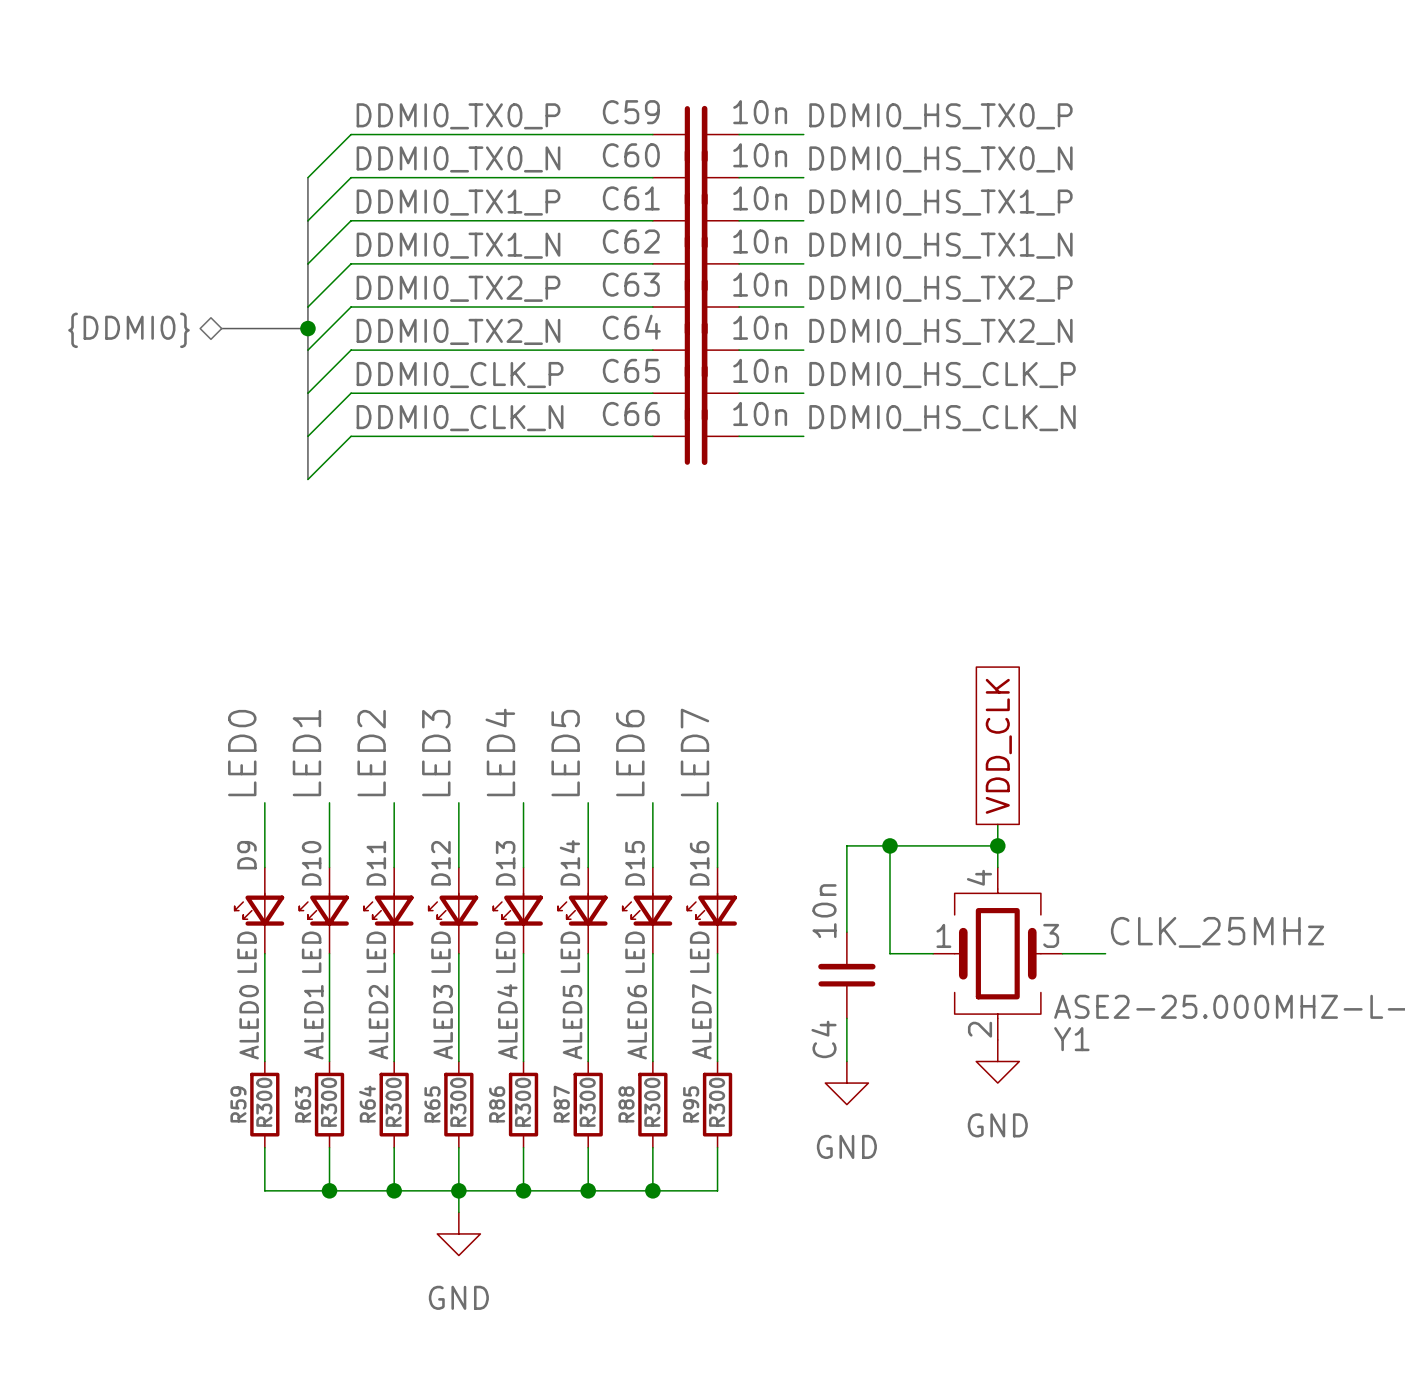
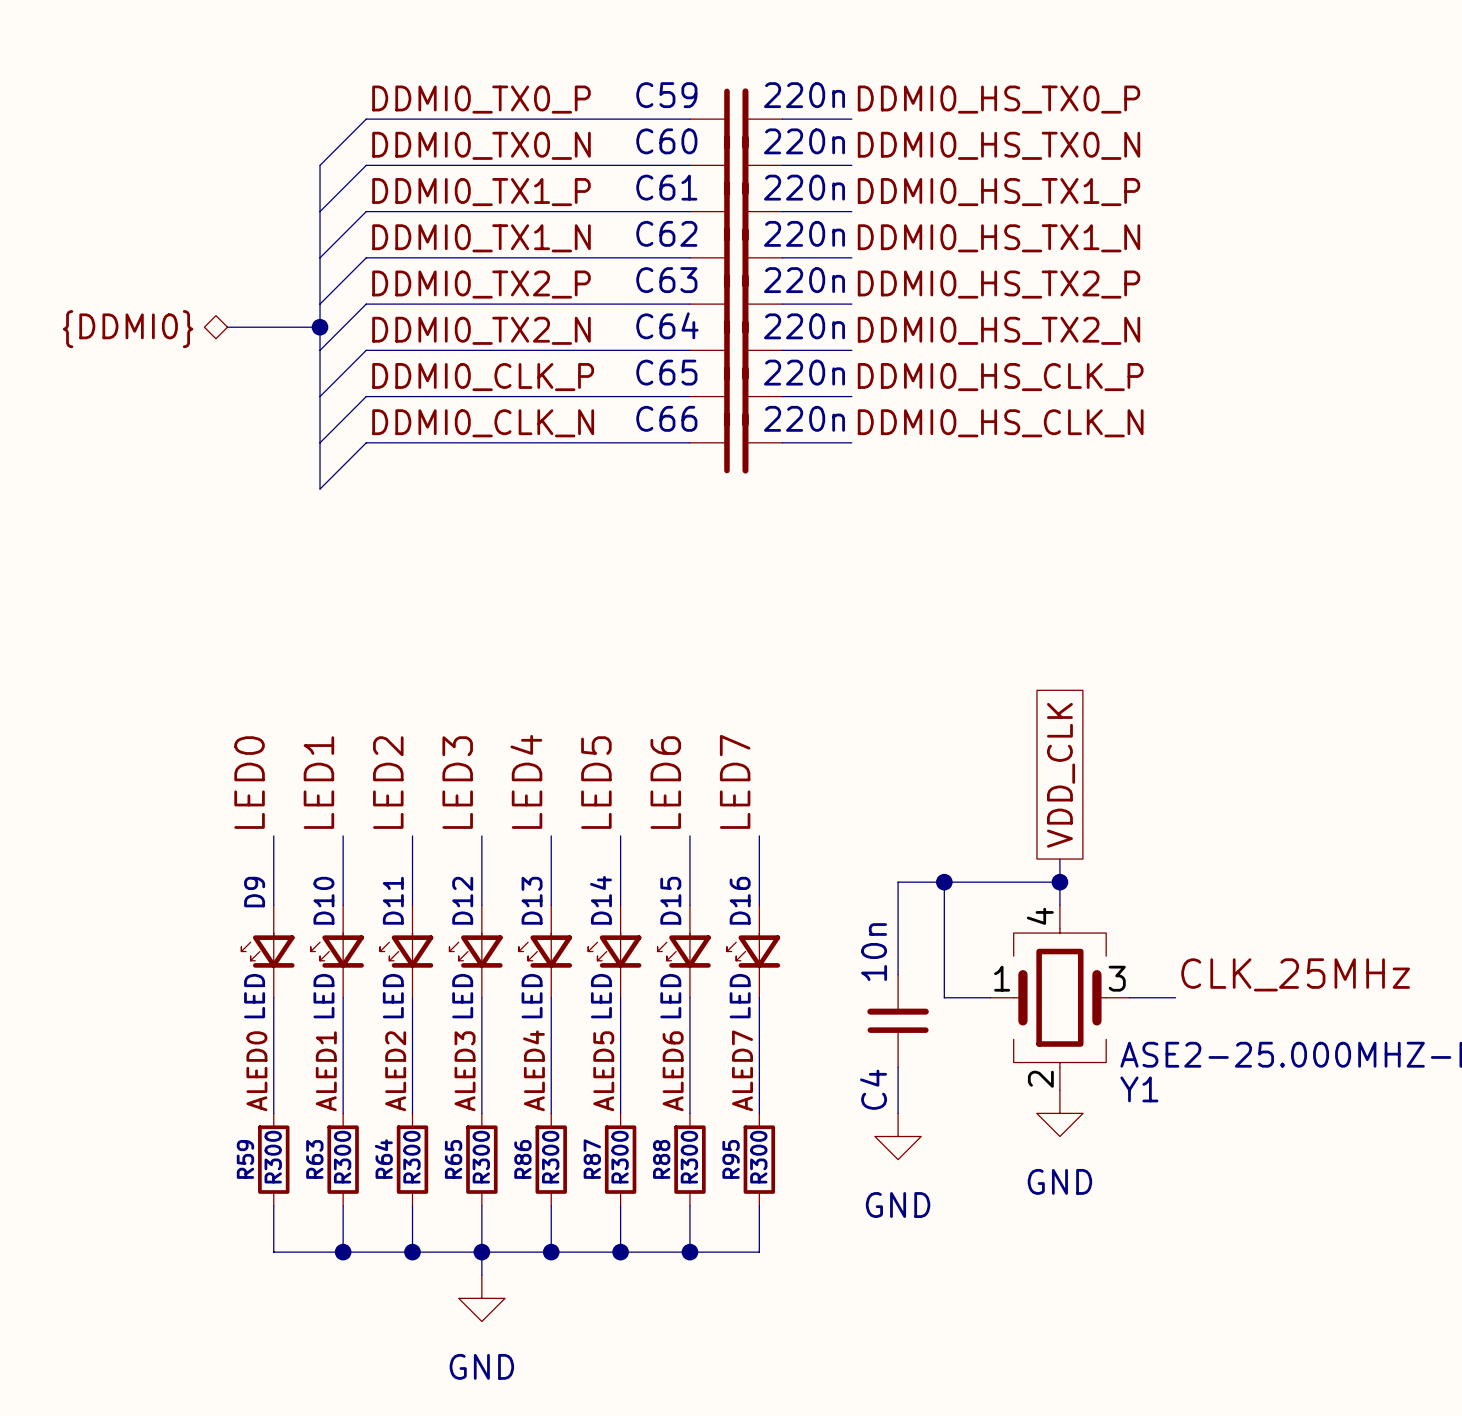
C59 value: 10n (760, 112) -> 220n (804, 95)
C60 value: 10n (760, 155) -> 220n (804, 141)
C61 value: 10n (760, 198) -> 220n (804, 187)
C62 value: 10n (760, 241) -> 220n (804, 233)
C63 value: 10n (760, 284) -> 220n (804, 280)
C64 value: 10n (760, 327) -> 220n (804, 326)
C65 value: 10n (760, 370) -> 220n (804, 372)
C66 value: 10n (760, 413) -> 220n (804, 418)

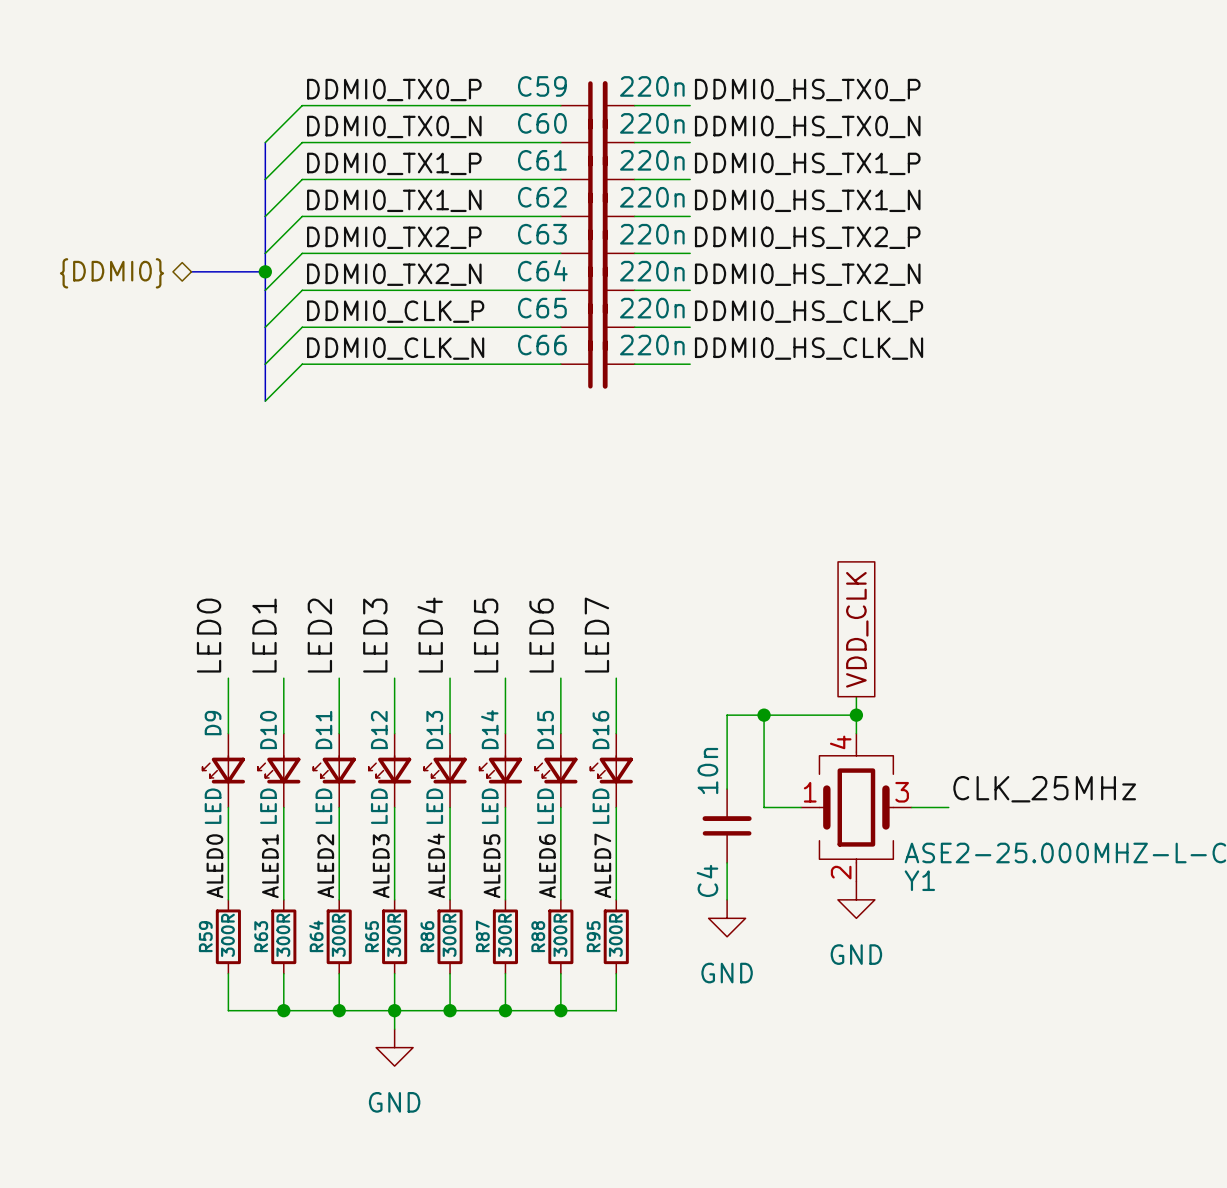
R59 value: R300 (273, 1157) -> 300R (227, 935)
R63 value: R300 (342, 1157) -> 300R (283, 935)
R64 value: R300 (411, 1157) -> 300R (338, 935)
R65 value: R300 (481, 1157) -> 300R (394, 935)
R86 value: R300 (550, 1157) -> 300R (449, 935)
R87 value: R300 (620, 1157) -> 300R (505, 935)
R88 value: R300 (689, 1157) -> 300R (560, 935)
R95 value: R300 (758, 1157) -> 300R (615, 935)

